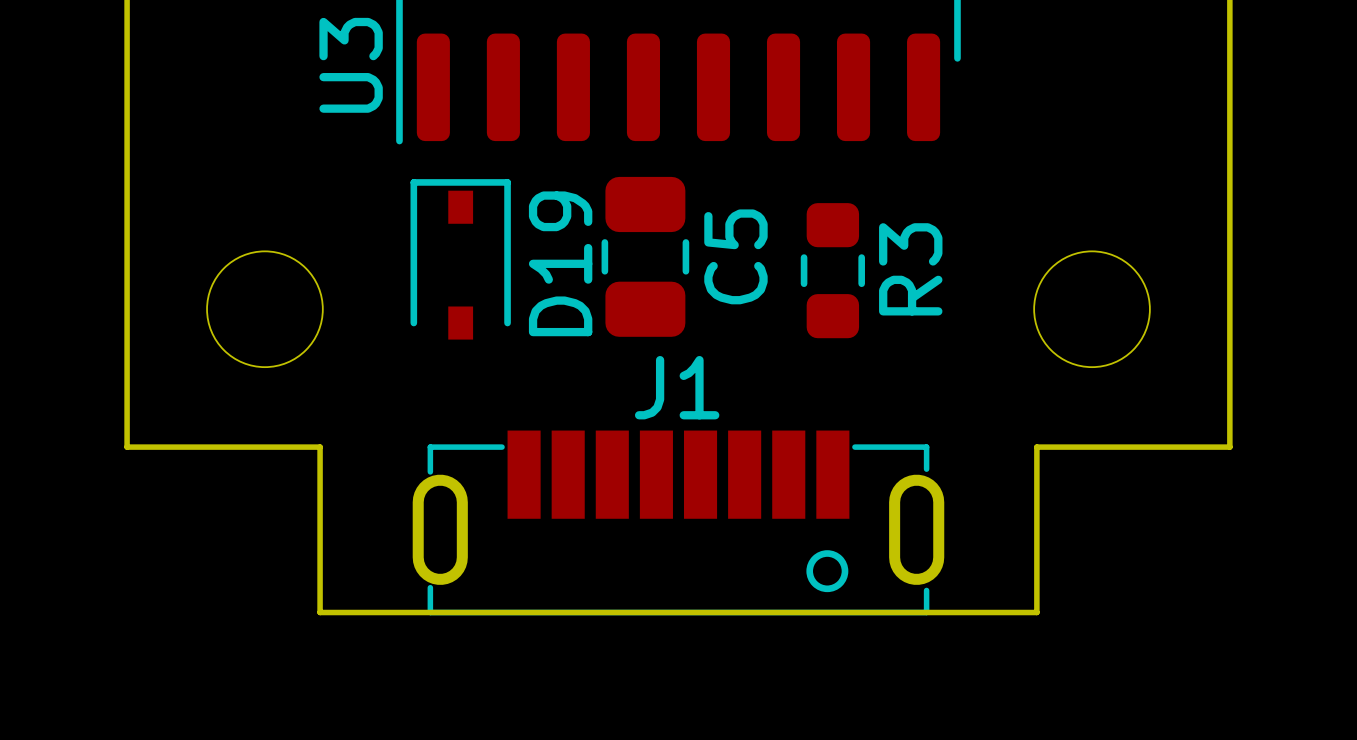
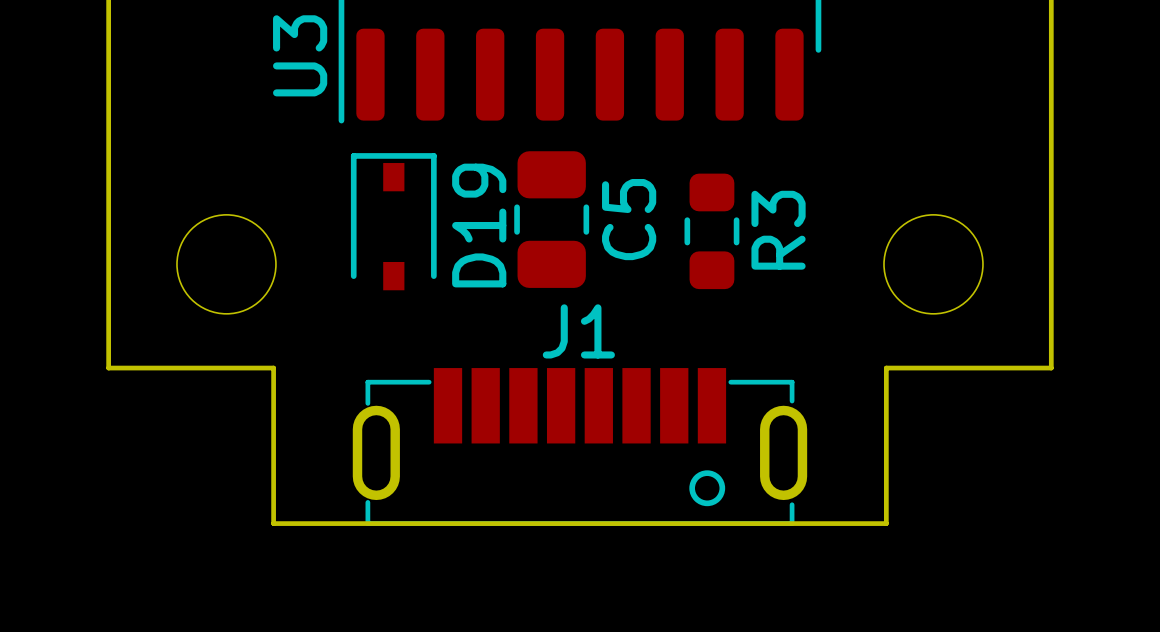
board edge: (127, 430) (127, 447) (320, 447) -> (108, 368) (273, 368) (273, 382)
board edge: (1229, 430) (1229, 447) (1036, 447) -> (1051, 368) (886, 368) (886, 382)

